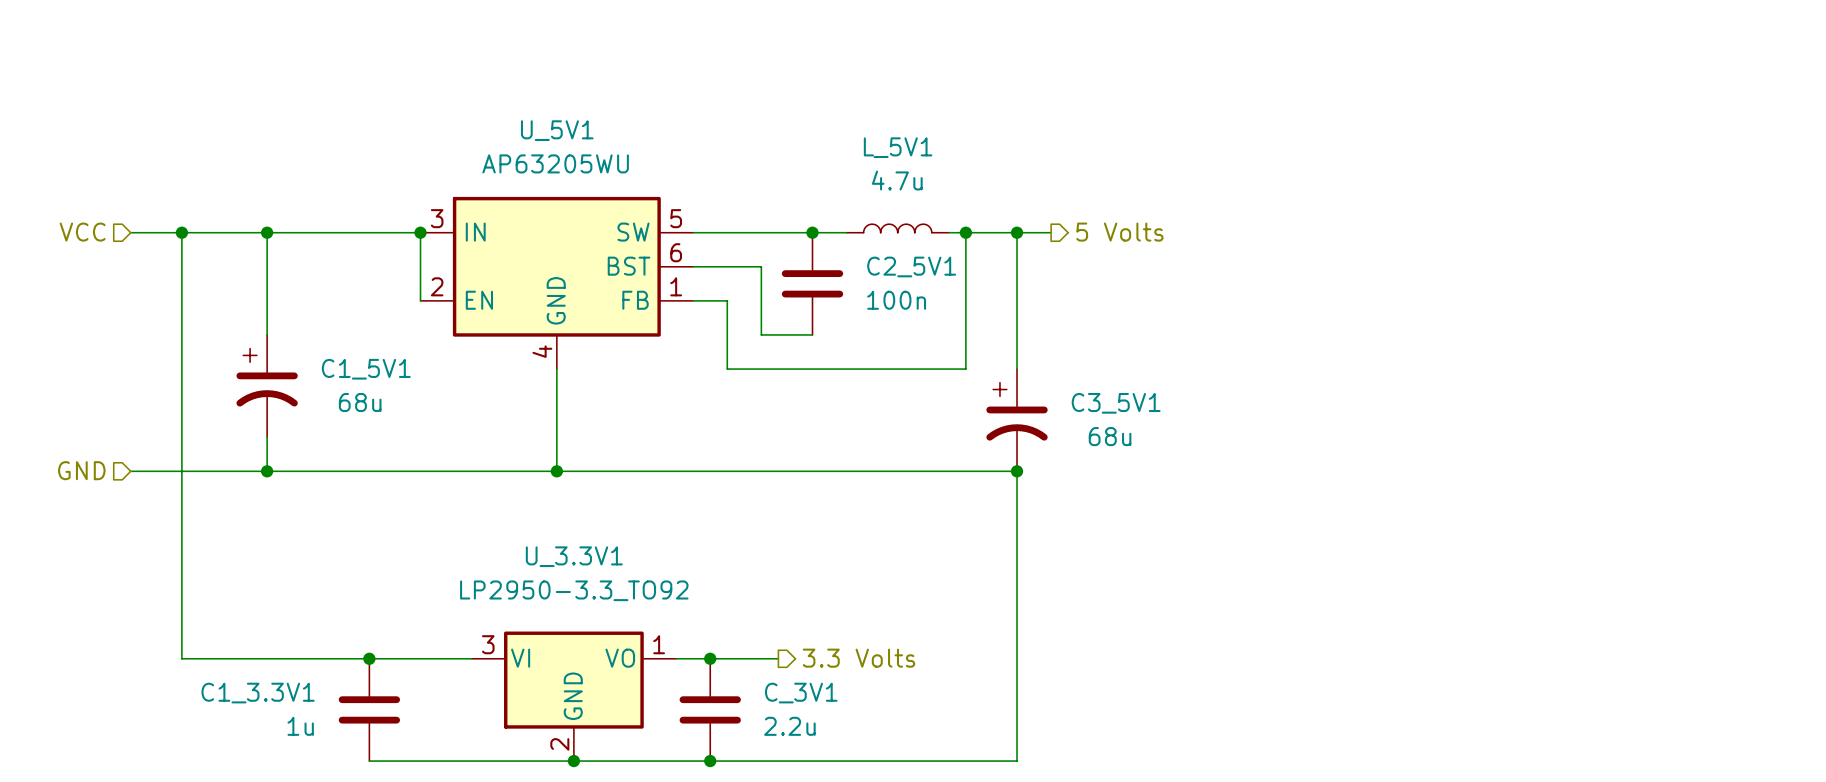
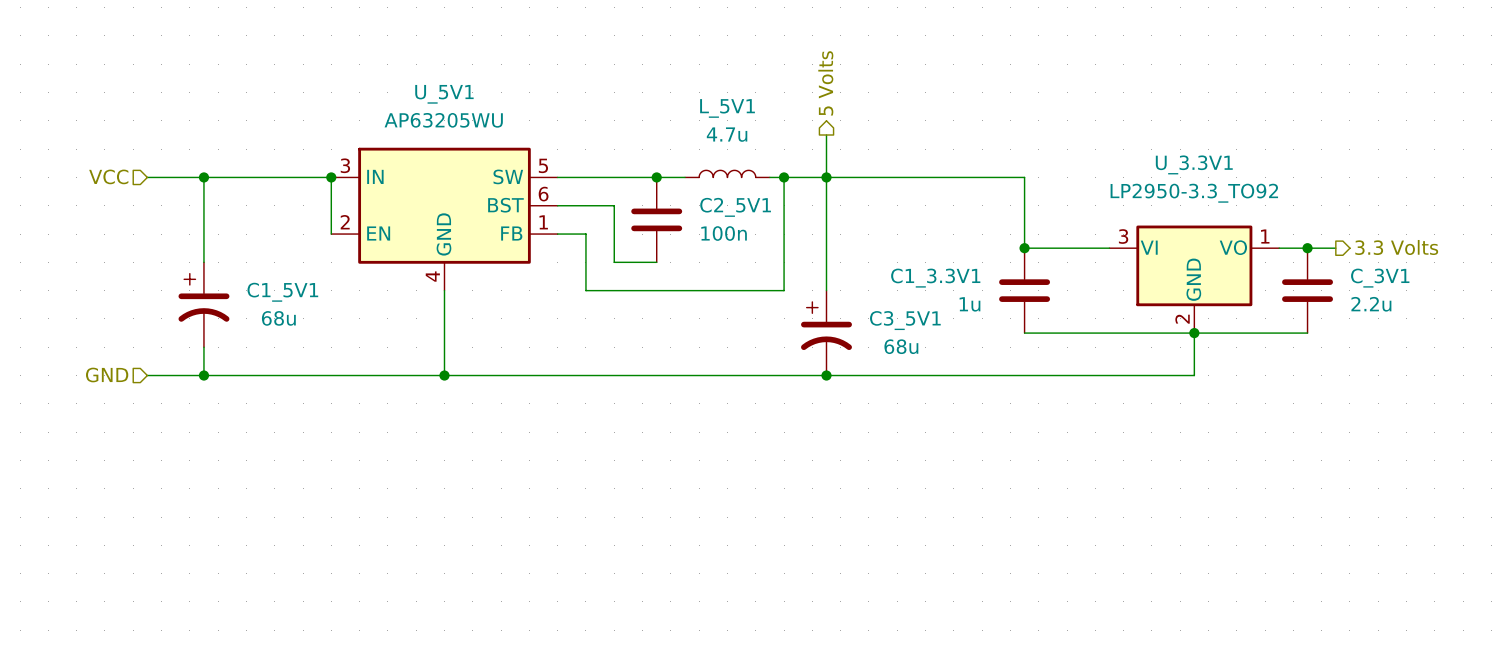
wire: none -> (826, 135) (826, 177)
hierarchical label position: VCC (82, 232) -> VCC (108, 176)
wire: (130, 232) (198, 232) -> none
wire: (181, 232) (181, 658) (471, 658) -> none
junction: (181, 232) -> none
wire: none -> (854, 177) (1024, 177) (1024, 248) (1109, 248)
hierarchical label rotation: 0° (1119, 232) -> 90° counterclockwise (825, 83)
hierarchical label position: 5 Volts (1119, 232) -> 5 Volts (825, 83)
junction: none -> (1024, 248)
wire: none -> (1279, 248) (1335, 248)
junction: none -> (1307, 248)
hierarchical label: none -> 3.3 Volts (1396, 247)
wire: none -> (1024, 333) (1307, 333)
junction: none -> (1194, 333)
hierarchical label position: GND (81, 470) -> GND (107, 375)
wire: (130, 471) (198, 471) -> none
wire: (1017, 471) (1017, 761) (369, 761) -> (826, 375) (1194, 375) (1194, 333)
junction: (369, 658) -> none
wire: (676, 658) (778, 658) -> none
junction: (710, 658) -> none
hierarchical label: 3.3 Volts (859, 658) -> none
U_3.3V1 position: (573, 696) -> (1194, 279)
C1_3.3V1 position: (369, 709) -> (1024, 290)
C_3V1 position: (710, 709) -> (1307, 290)
junction: (573, 761) -> none
junction: (710, 761) -> none

